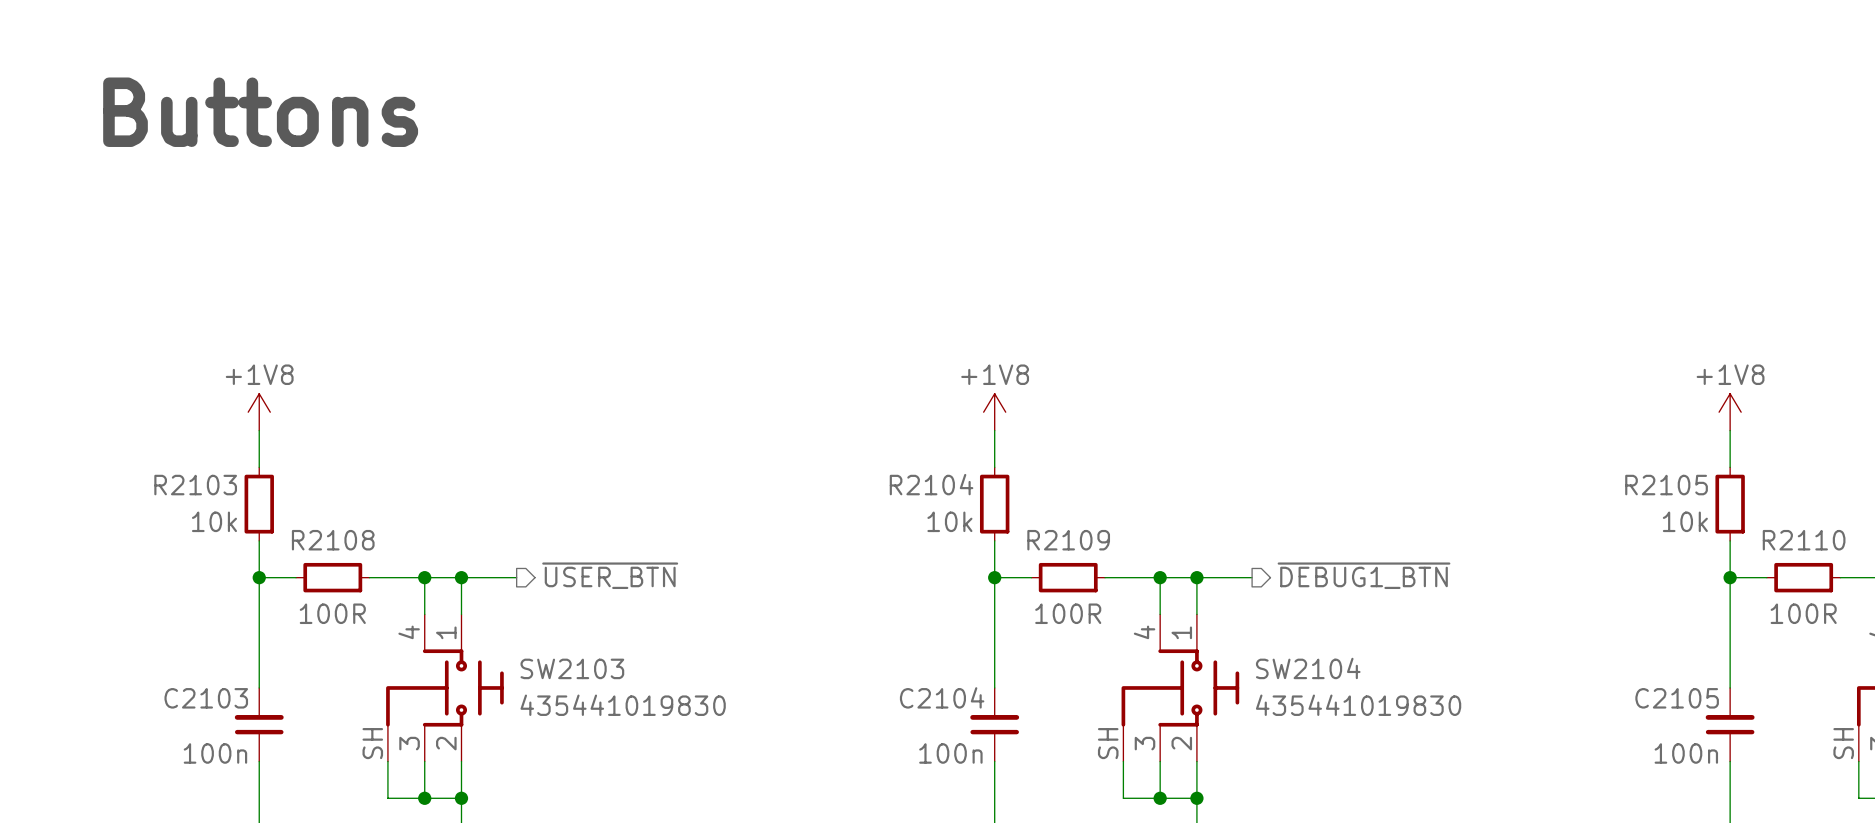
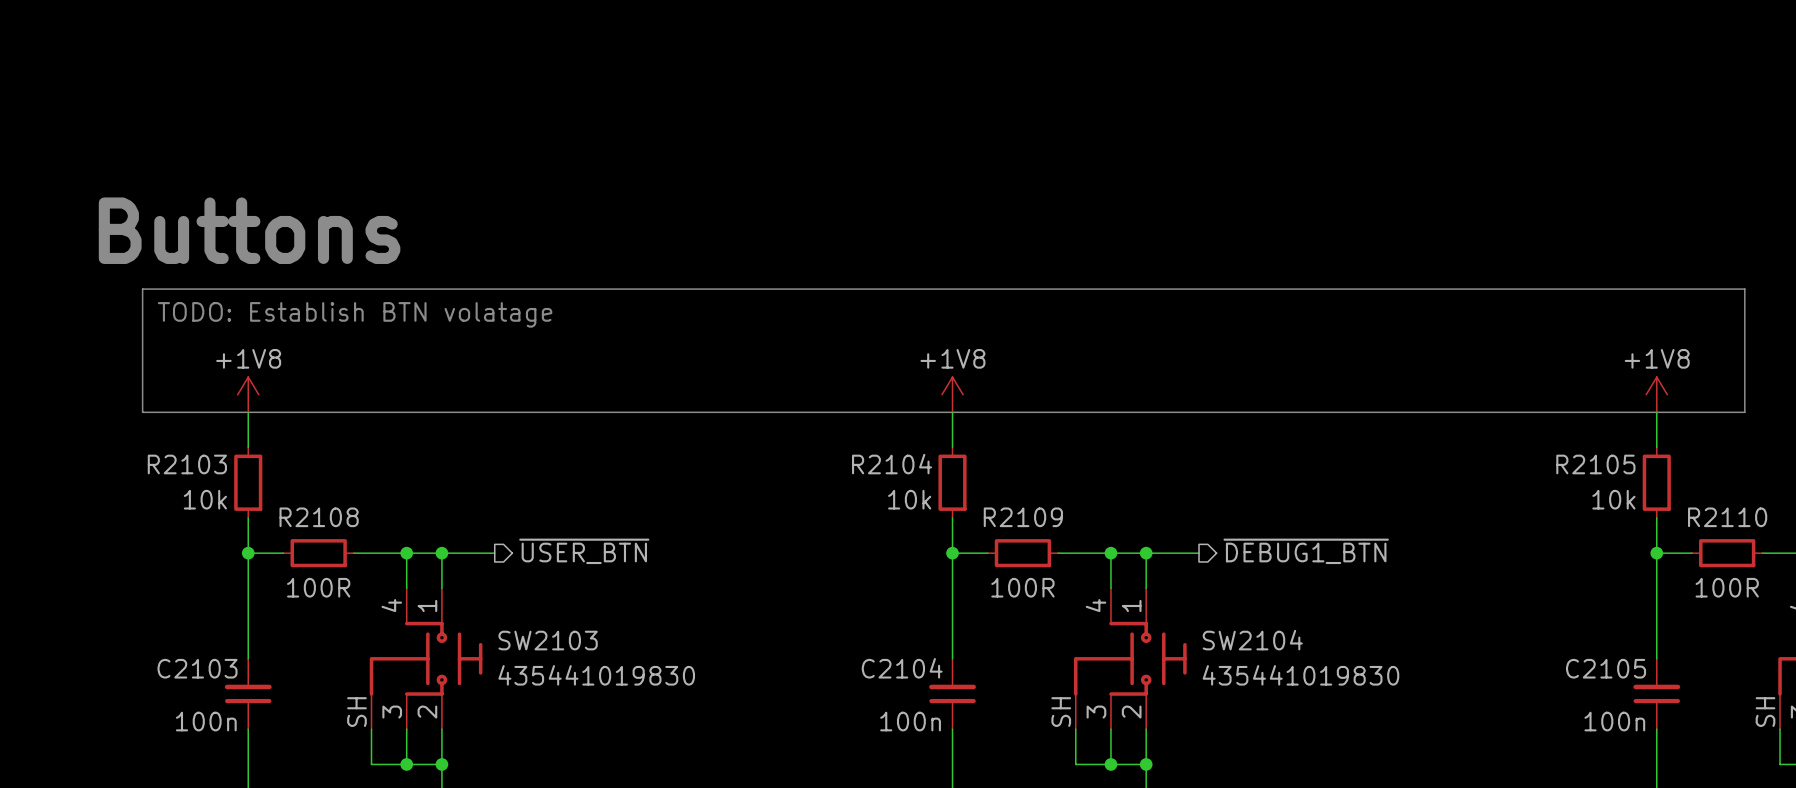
text position: Buttons (260, 112) -> Buttons (249, 230)
line: none -> (142, 289) (1744, 289) (1744, 412) (142, 412) (142, 289)
text: none -> TODO: Establish BTN volatage (355, 314)

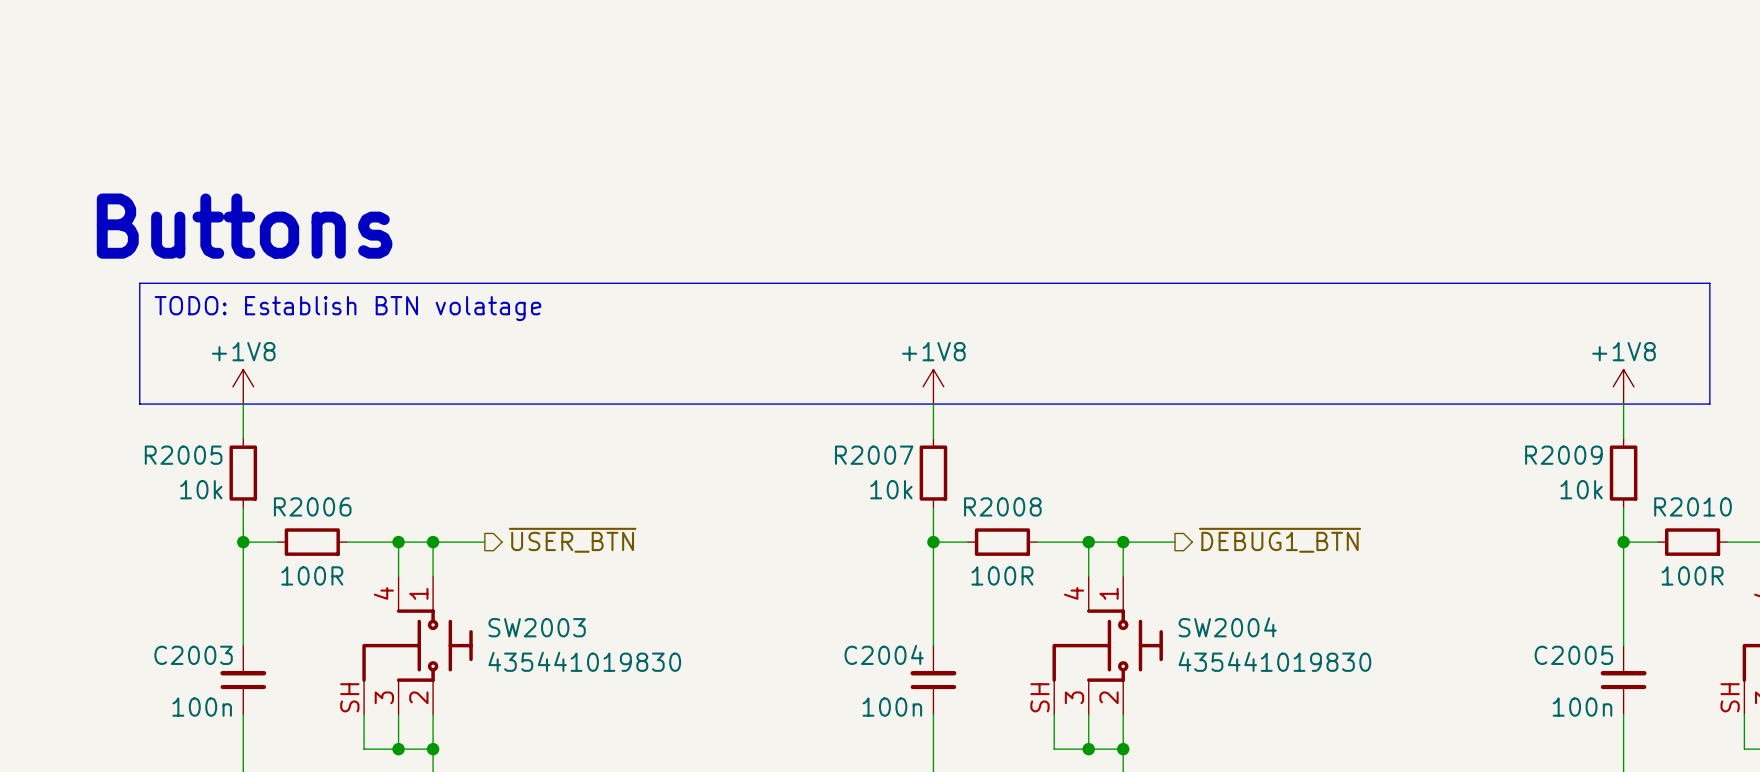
R2103 name: R2103 (187, 464) -> R2005 (183, 455)
R2104 name: R2104 (892, 464) -> R2007 (874, 455)
R2105 name: R2105 (1595, 464) -> R2009 (1563, 455)
R2108 name: R2108 (319, 517) -> R2006 (312, 506)
R2109 name: R2109 (1023, 517) -> R2008 (1002, 506)
R2110 name: R2110 (1727, 517) -> R2010 (1693, 506)
SW2103 name: SW2103 (548, 640) -> SW2003 (537, 627)
SW2104 name: SW2104 (1252, 640) -> SW2004 (1227, 627)
C2103 name: C2103 (197, 668) -> C2003 (193, 655)
C2104 name: C2104 (902, 668) -> C2004 (884, 654)
C2105 name: C2105 (1606, 668) -> C2005 (1573, 655)

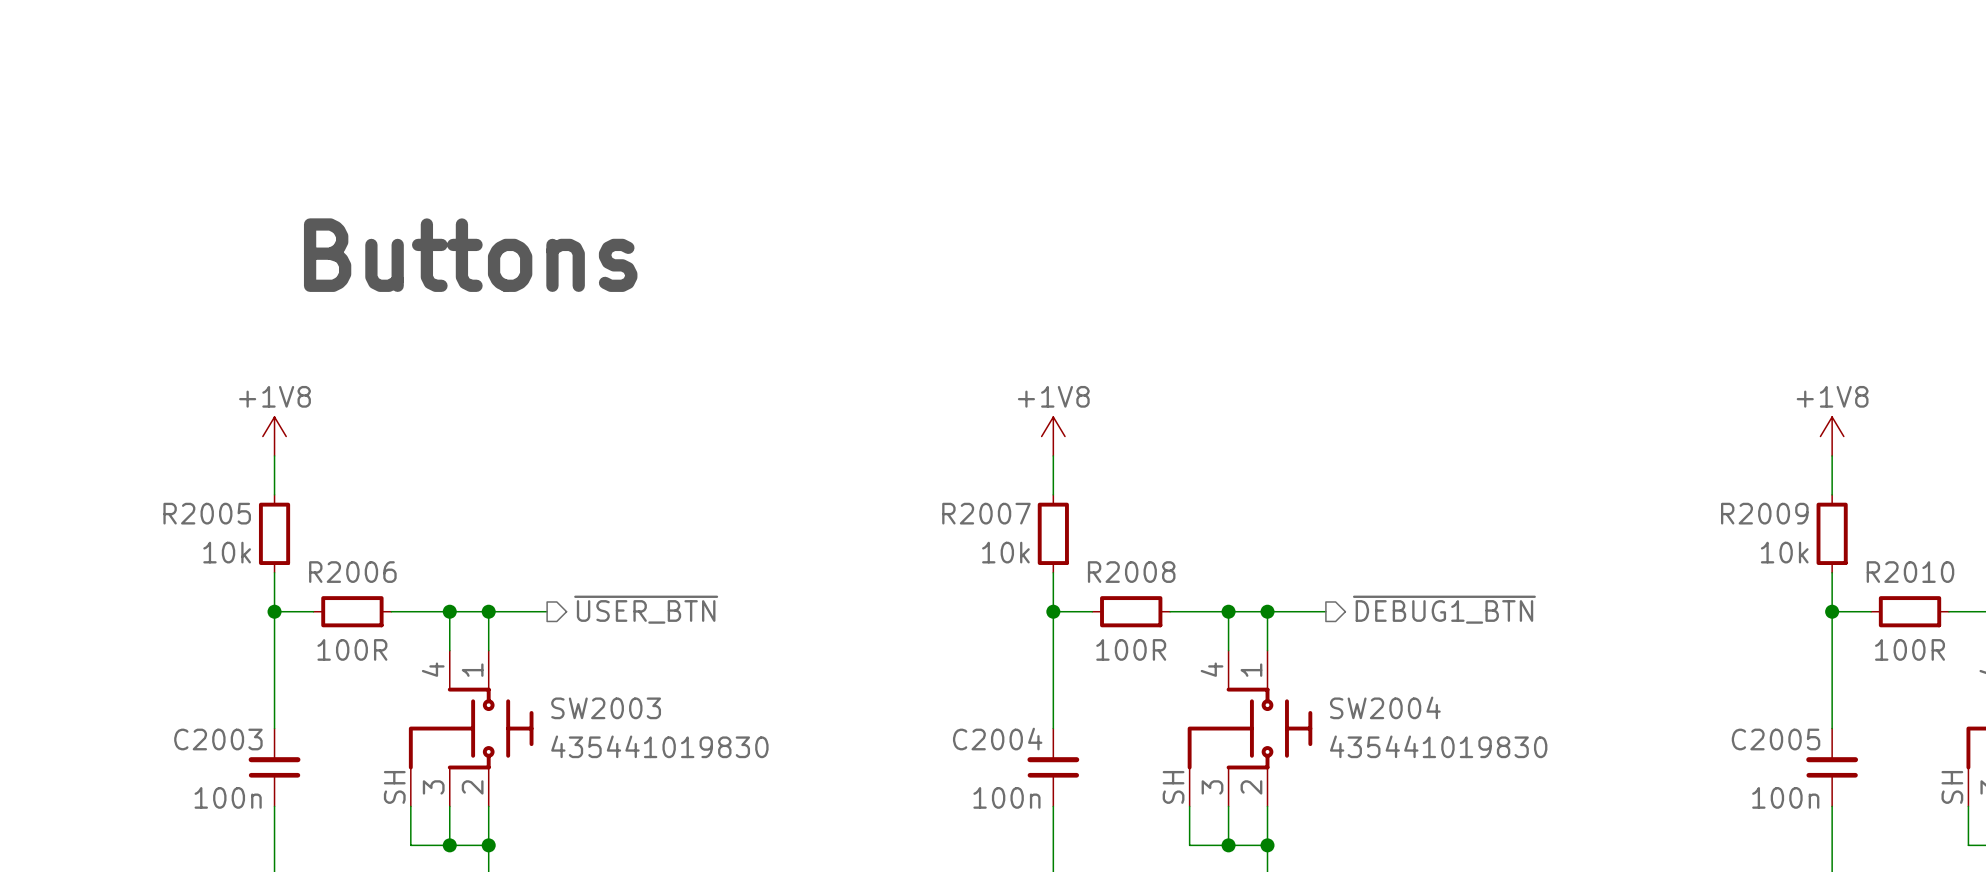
text position: Buttons (244, 226) -> Buttons (470, 255)
line: (139, 283) (1709, 283) (1709, 404) (139, 404) (139, 283) -> none
text: TODO: Establish BTN volatage (347, 308) -> none

